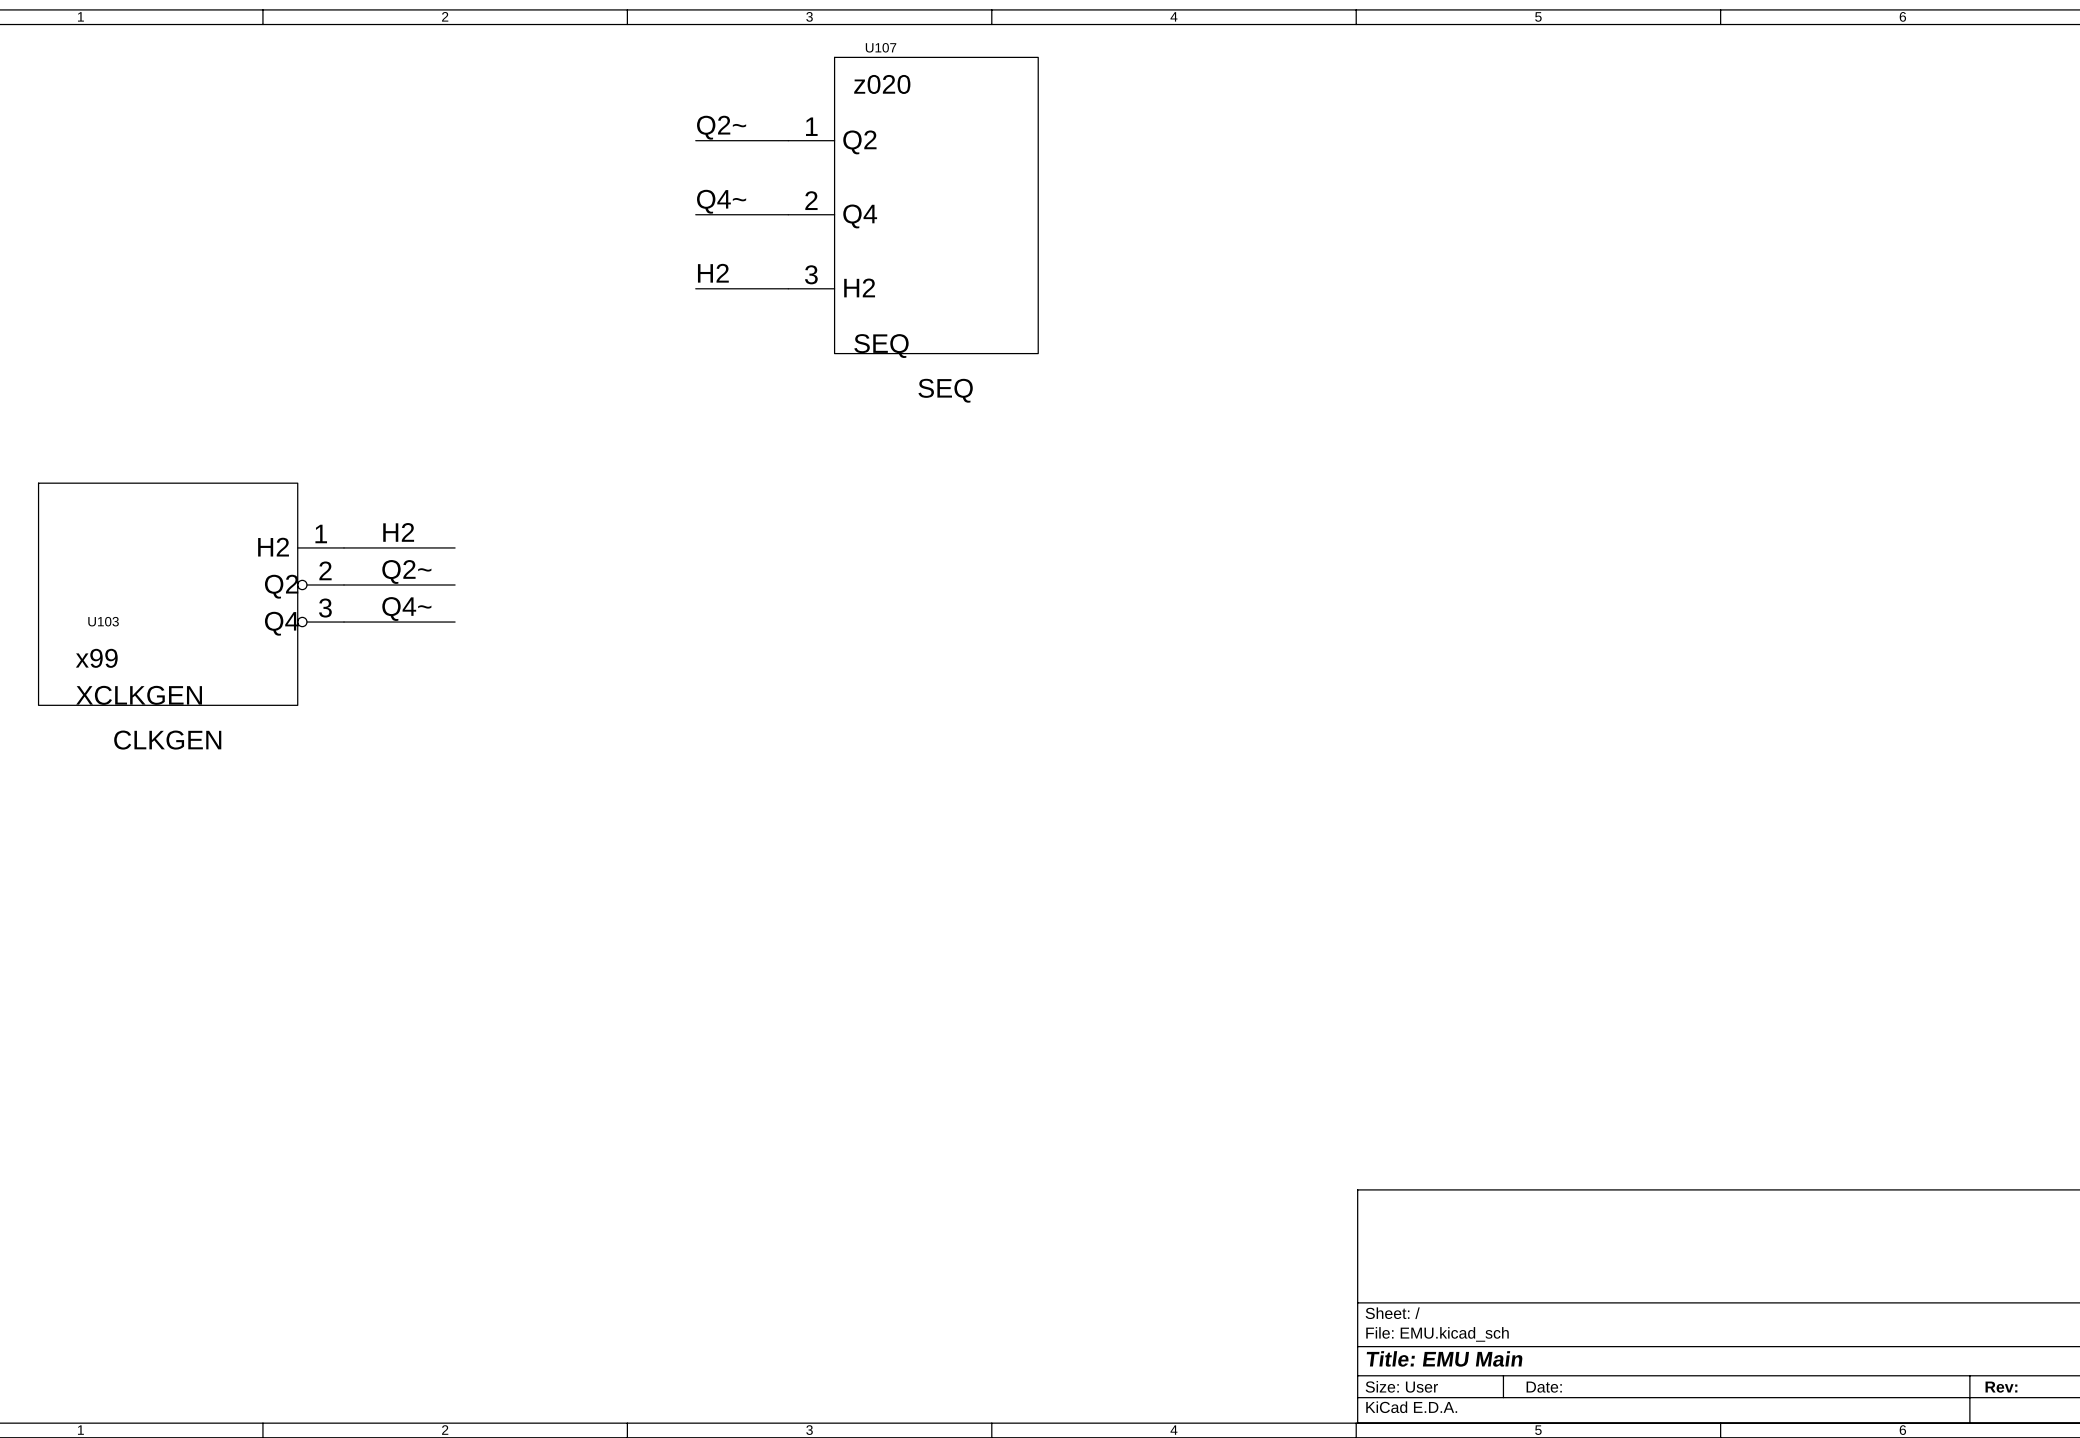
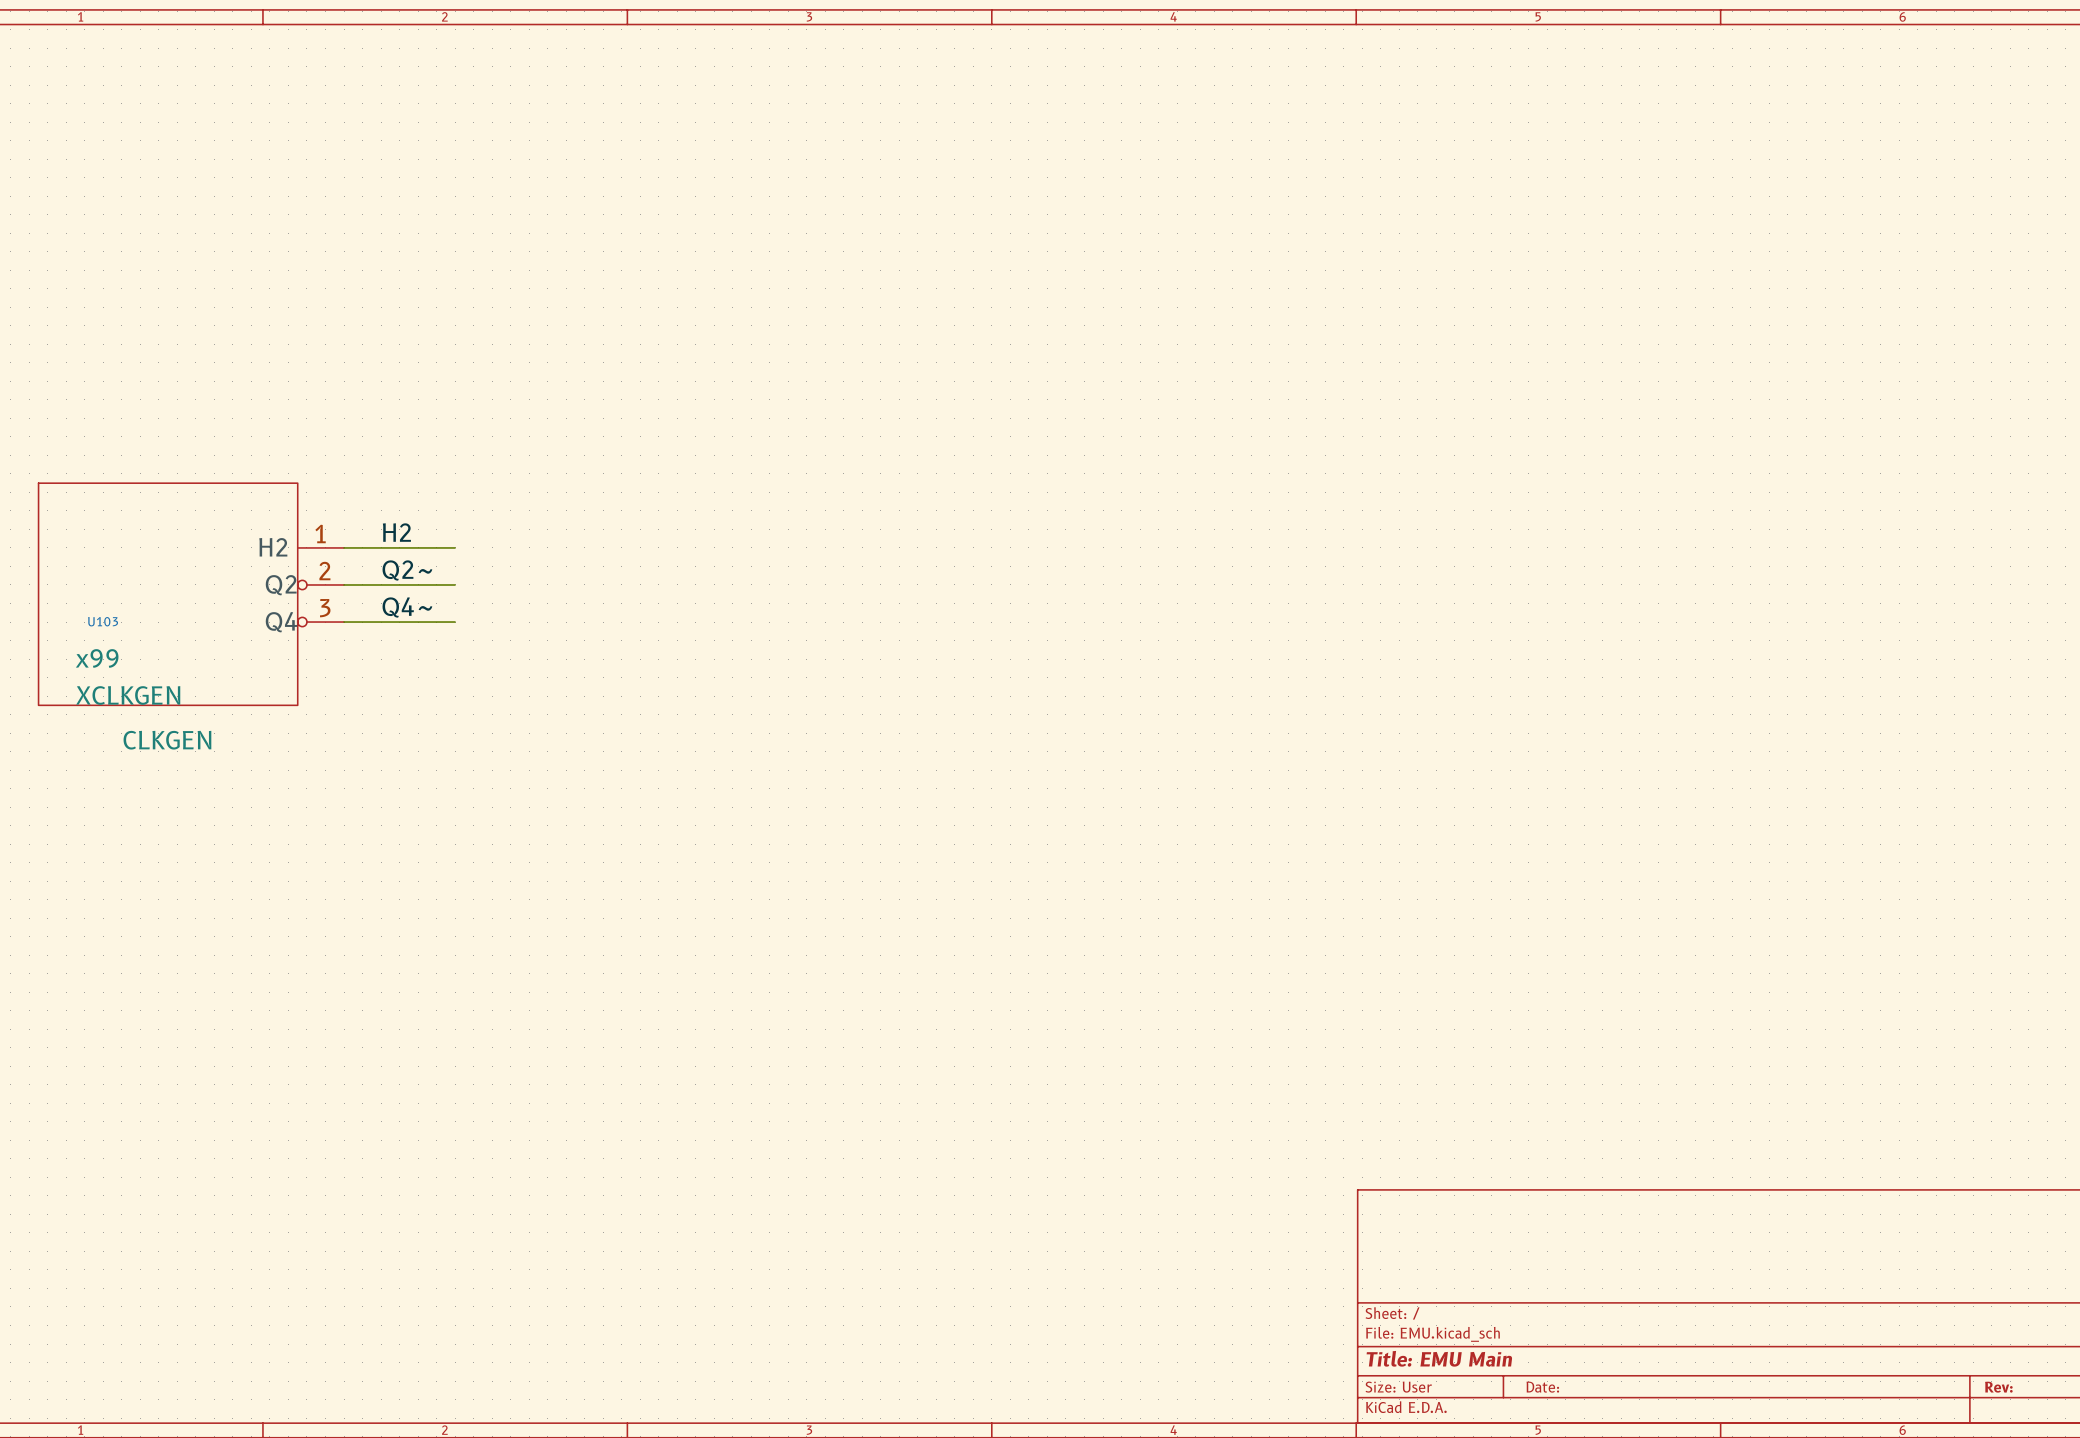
label: Q2~ (721, 127) -> none
wire: (695, 140) (788, 140) -> none
label: Q4~ (721, 201) -> none
U107: SEQ (913, 205) -> none
wire: (695, 214) (788, 214) -> none
label: H2 (713, 273) -> none
wire: (695, 288) (788, 288) -> none

